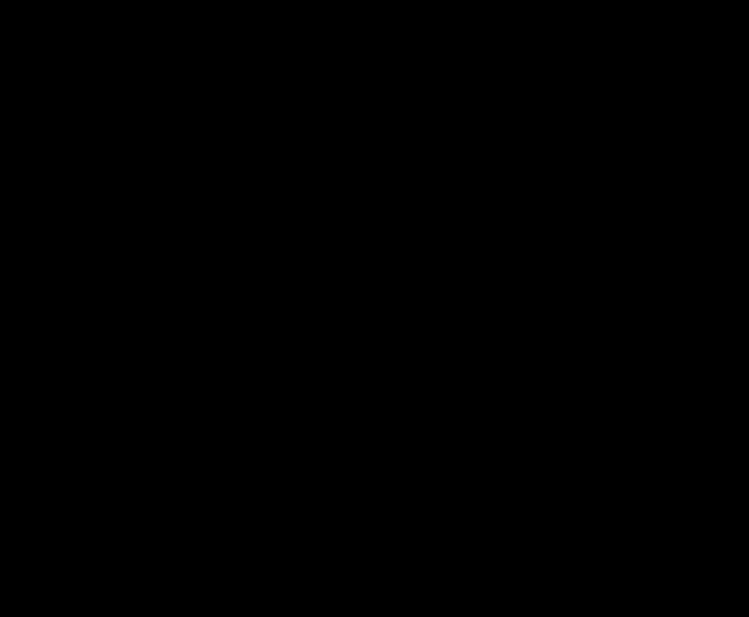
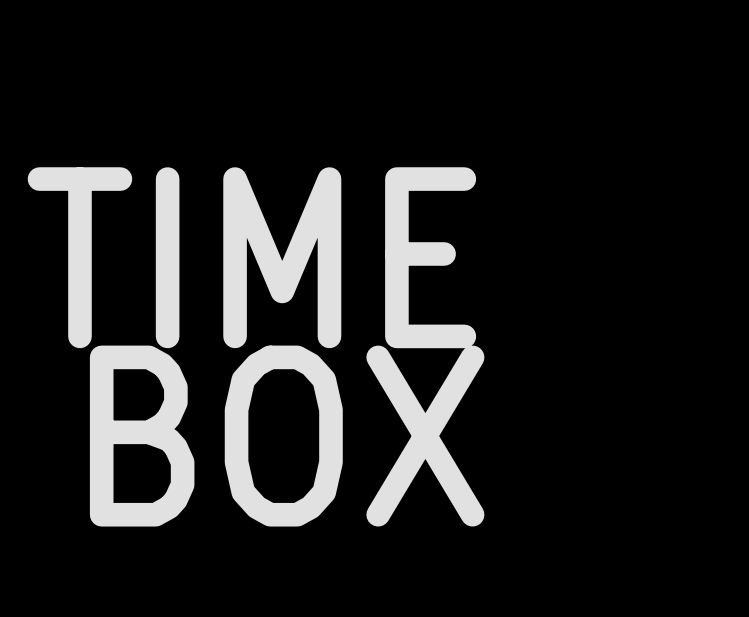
text: none -> TIME (251, 257)
text: none -> BOX (287, 436)

